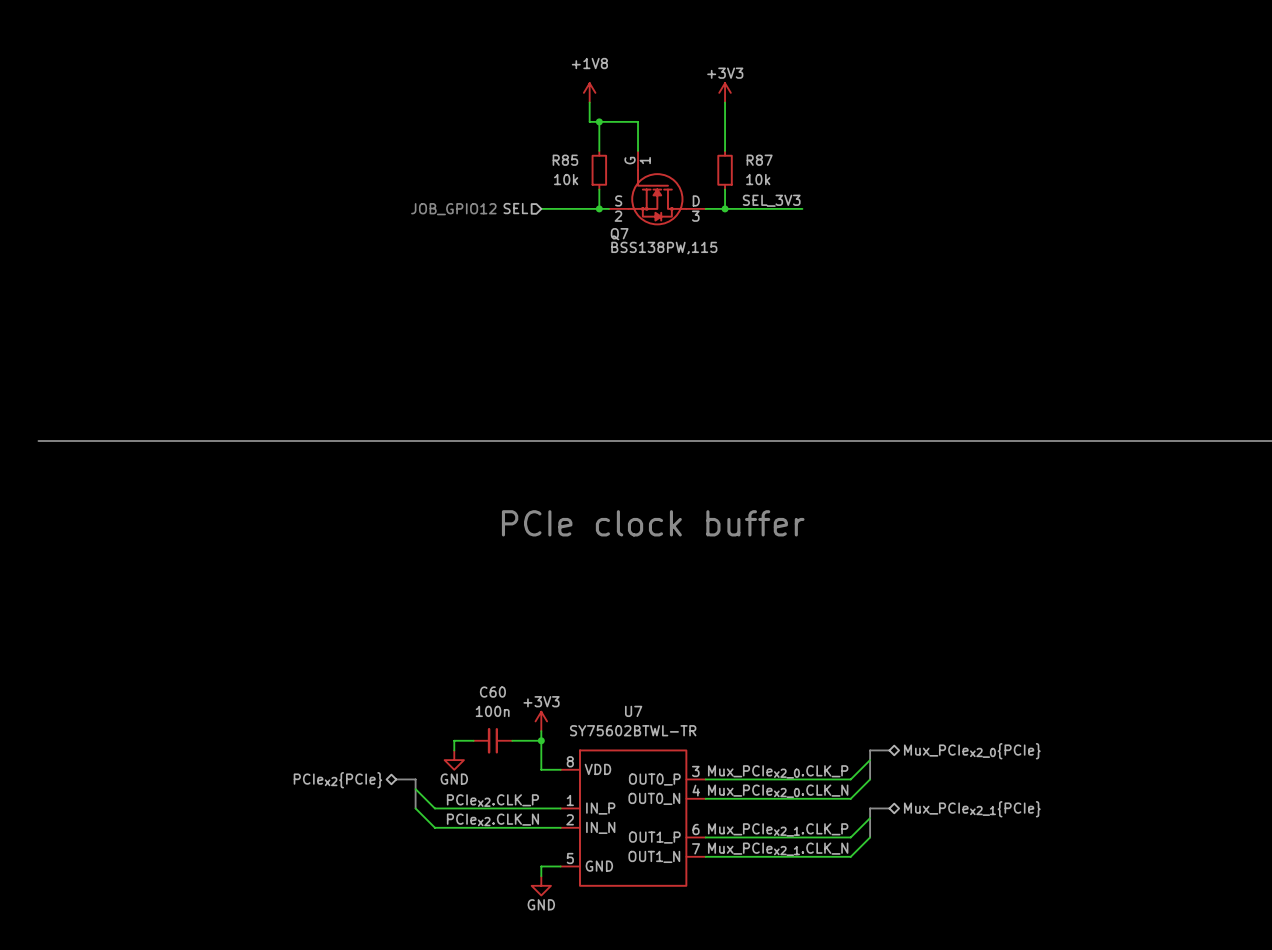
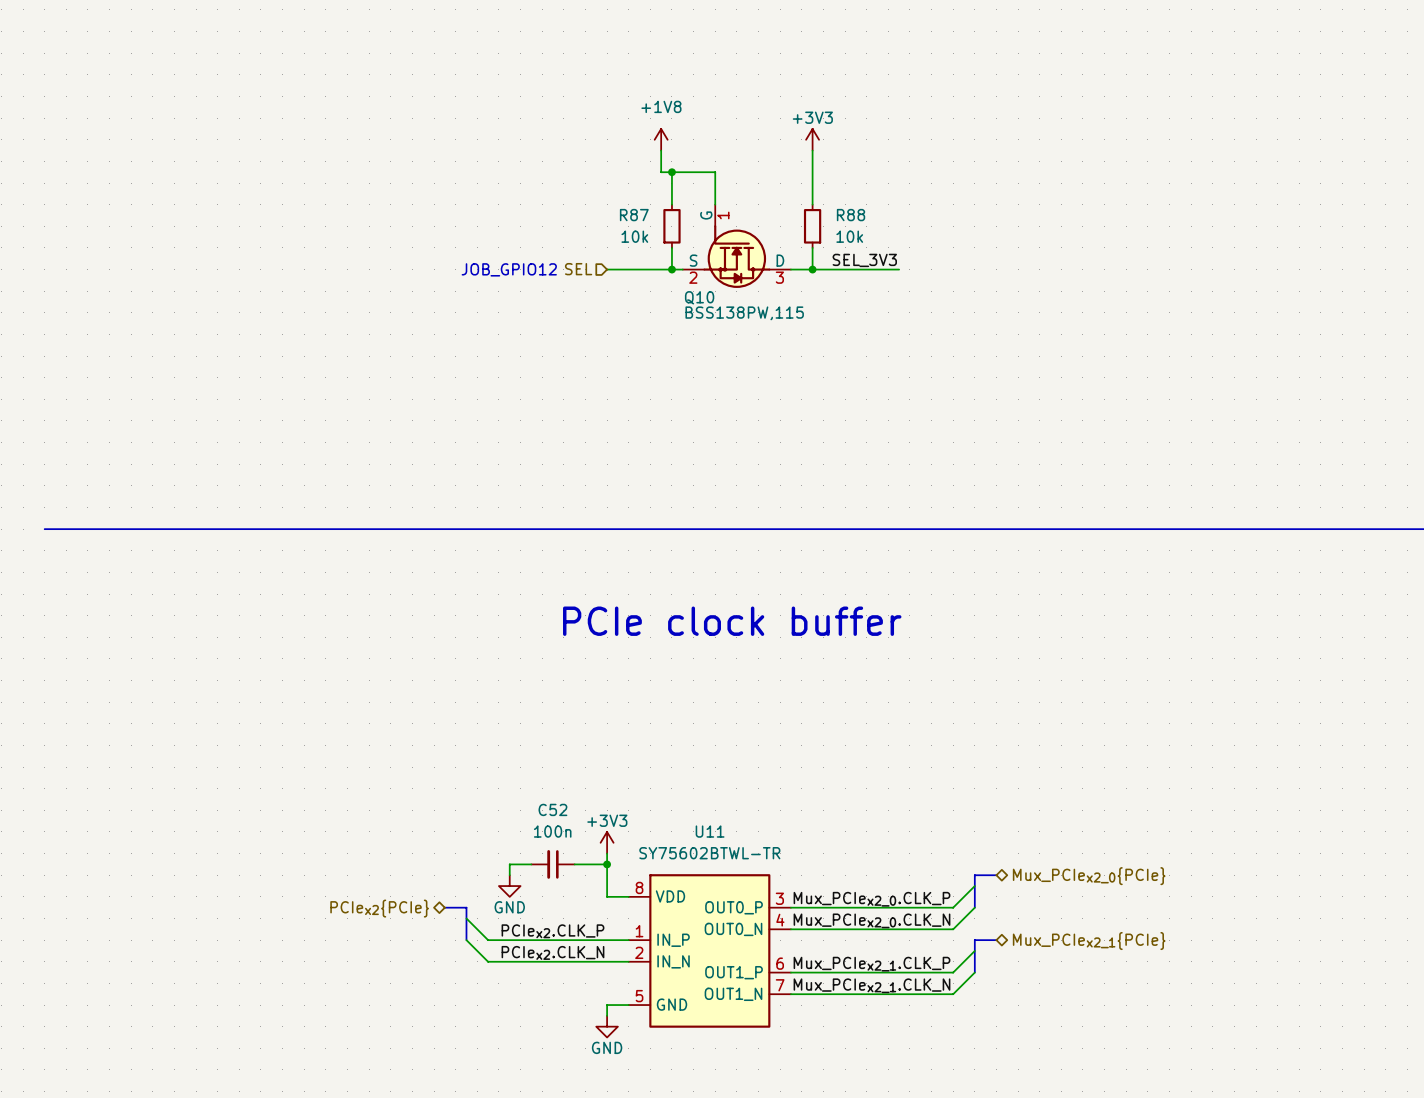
R85 name: R85 (565, 160) -> R87 (634, 215)
R87 name: R87 (759, 160) -> R88 (851, 215)
Q7 name: Q7 (619, 234) -> Q10 (699, 297)
C60 name: C60 (492, 692) -> C52 (552, 809)
U7 name: U7 (633, 711) -> U11 (710, 831)

